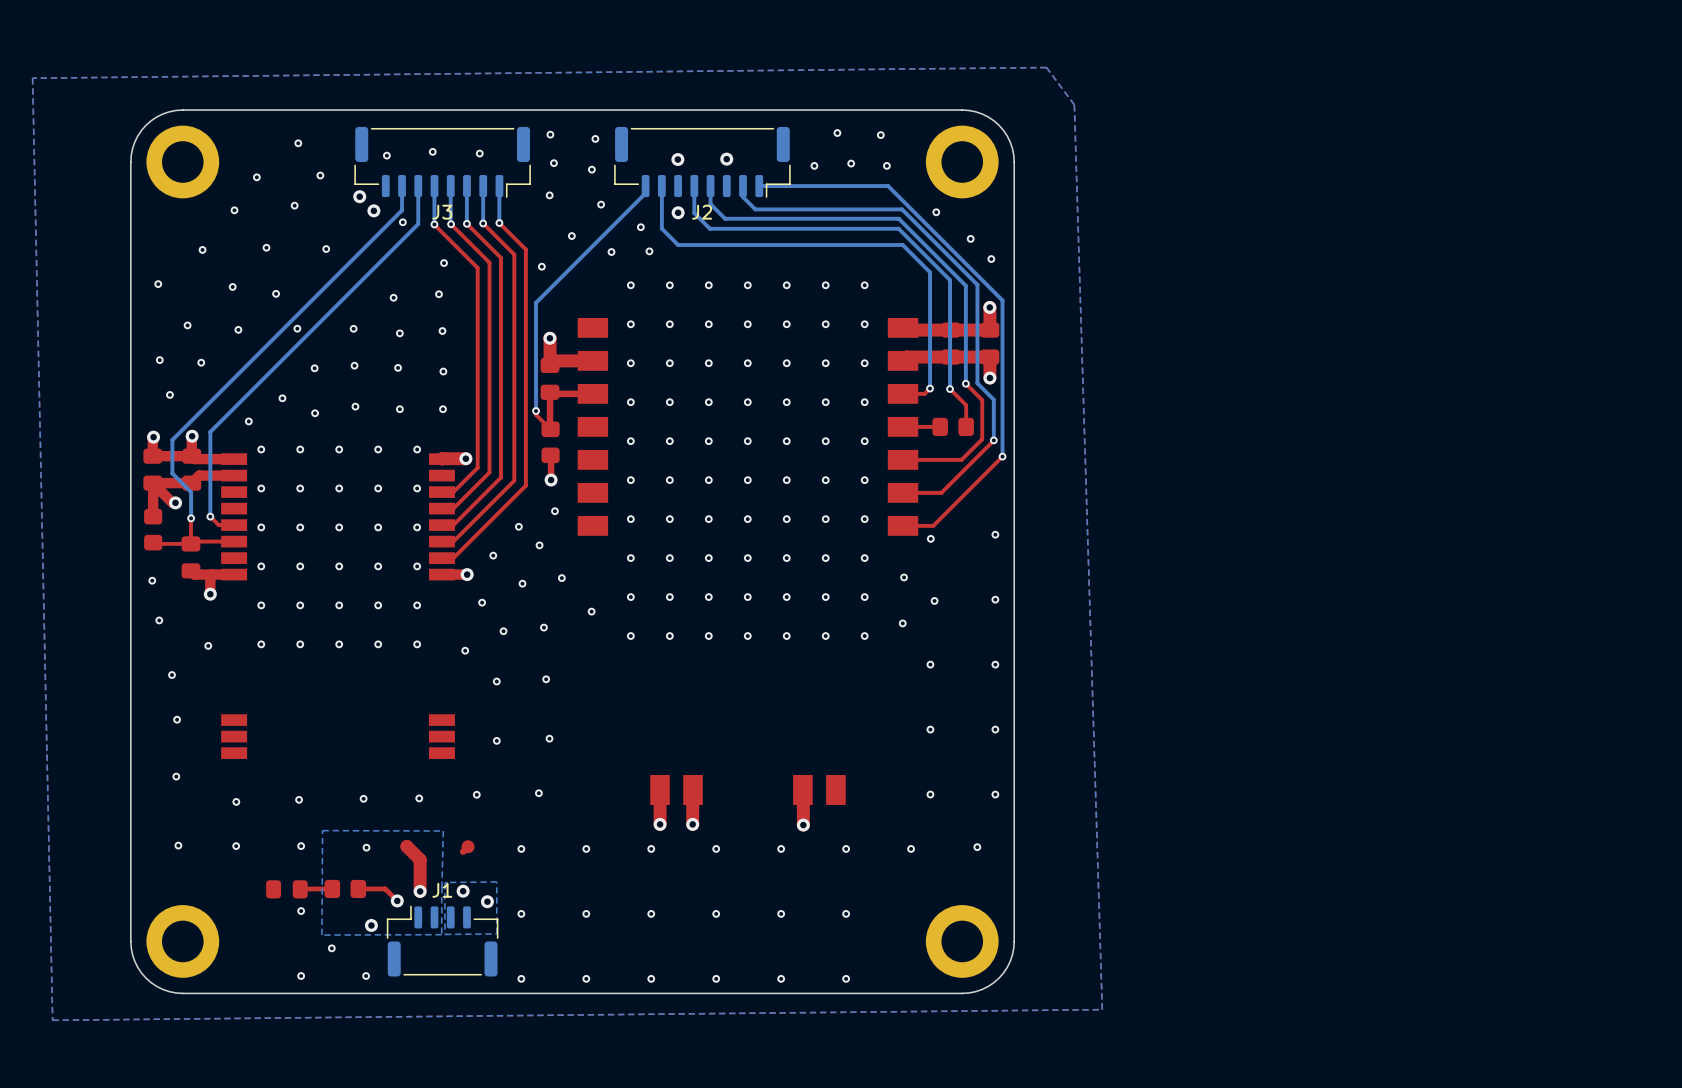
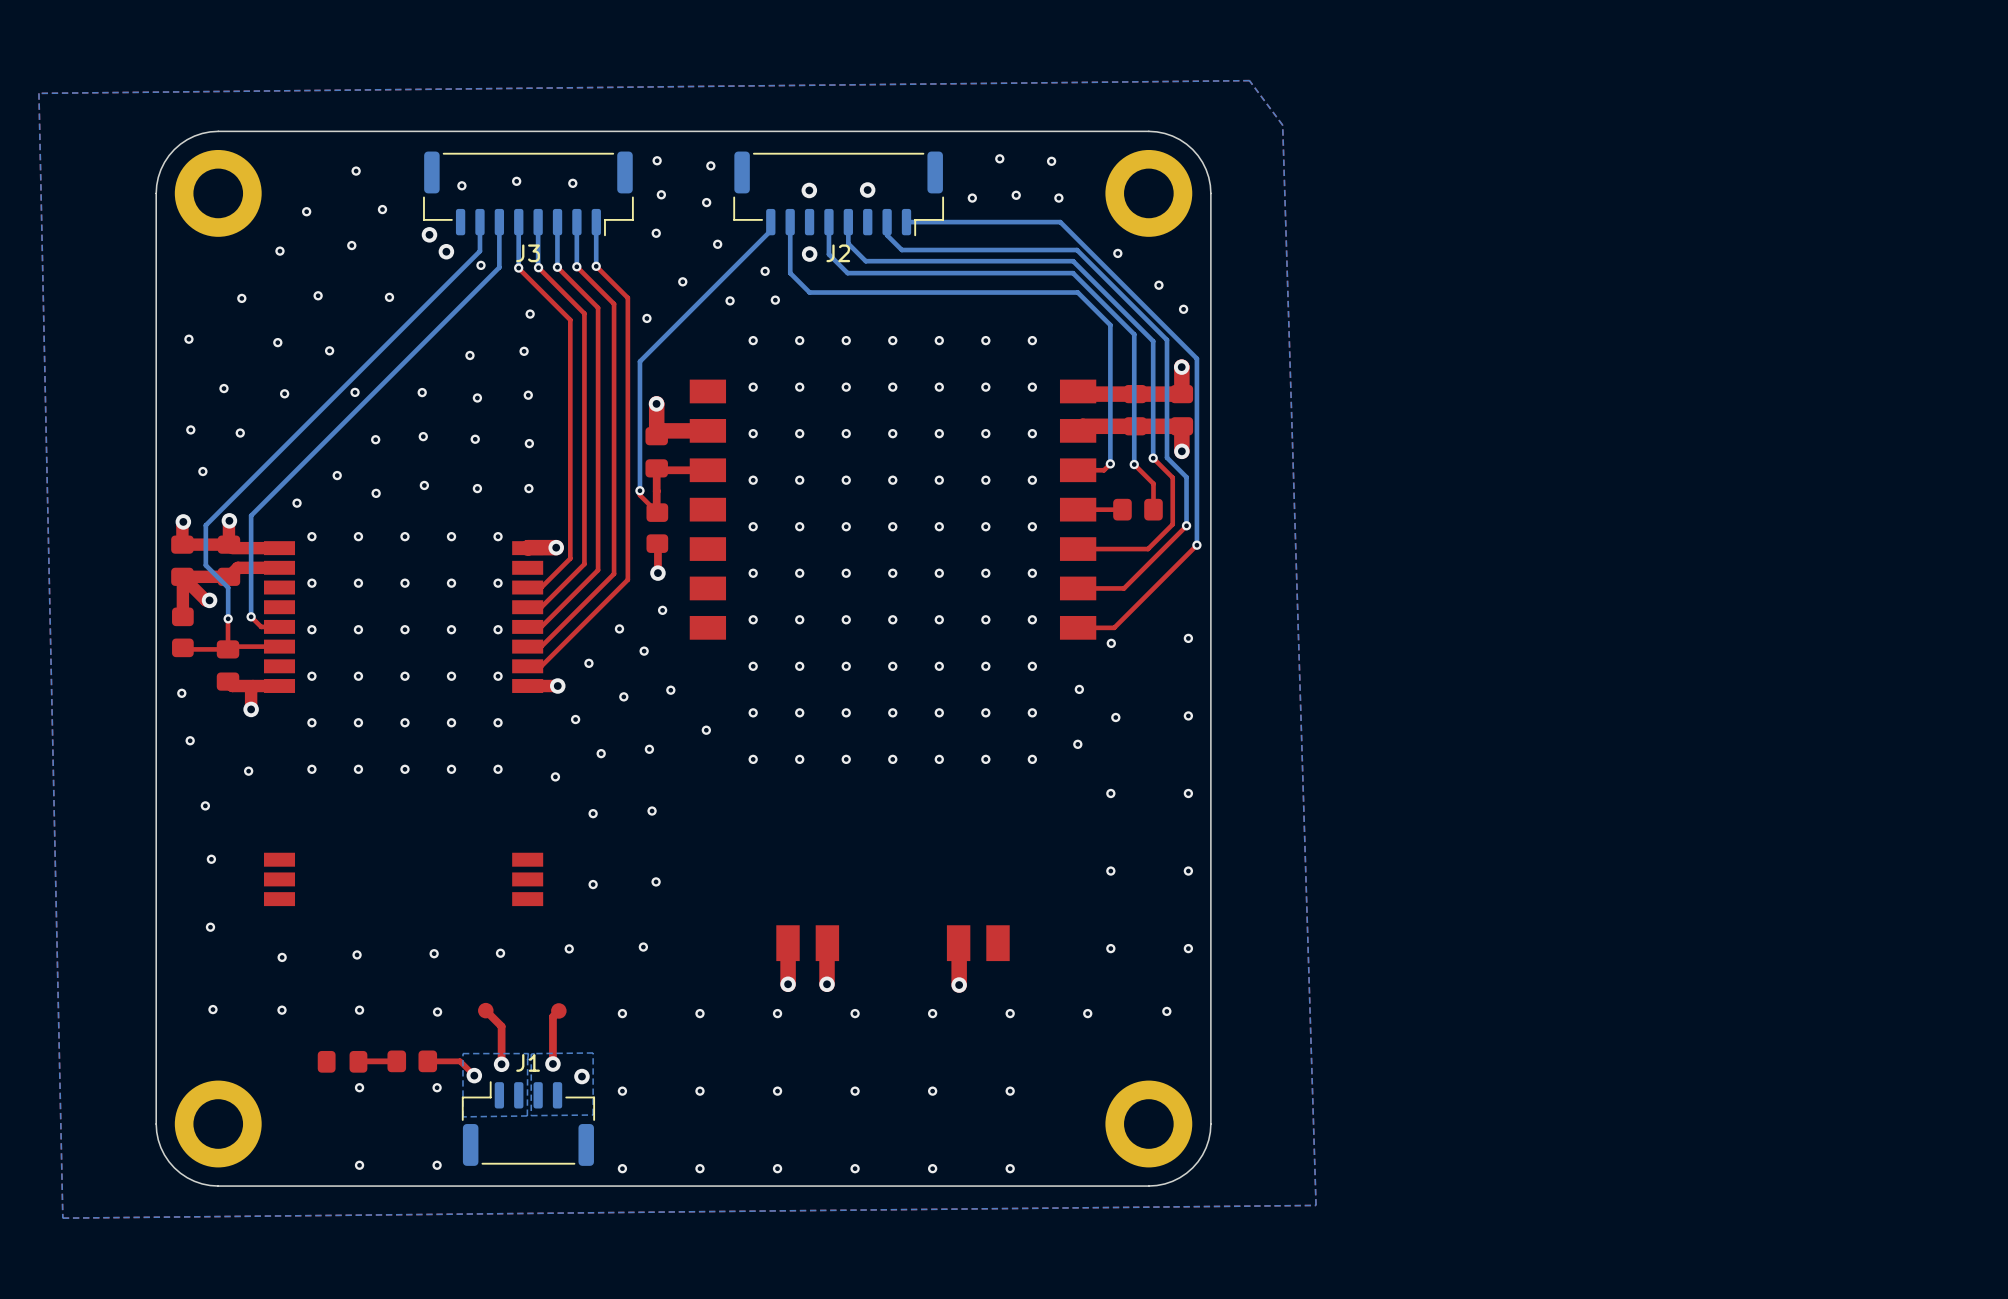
top track width: thick (406, 846) (420, 859) (420, 891) -> thin (485, 1010) (501, 1026) (501, 1064)
top track: none -> (552, 1016) (552, 1063)
bottom zone outline: (441, 887) (443, 831) (322, 830) (321, 935) (441, 934) -> (527, 1059) (528, 1053) (462, 1053) (462, 1116) (527, 1115)
via: (371, 925) -> none
via position: (331, 948) -> (437, 1087)

